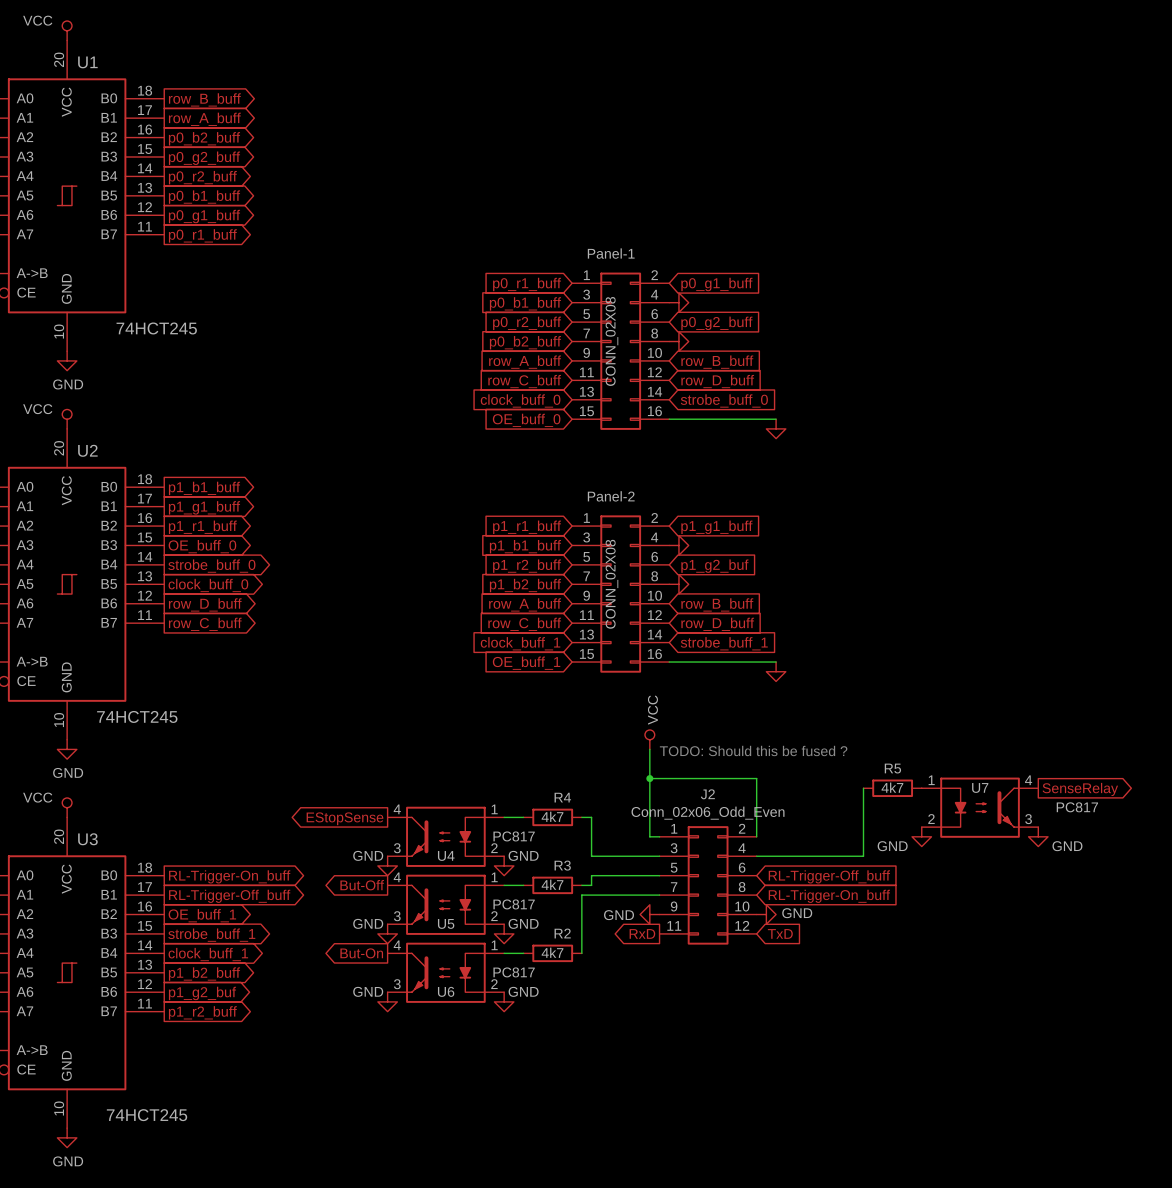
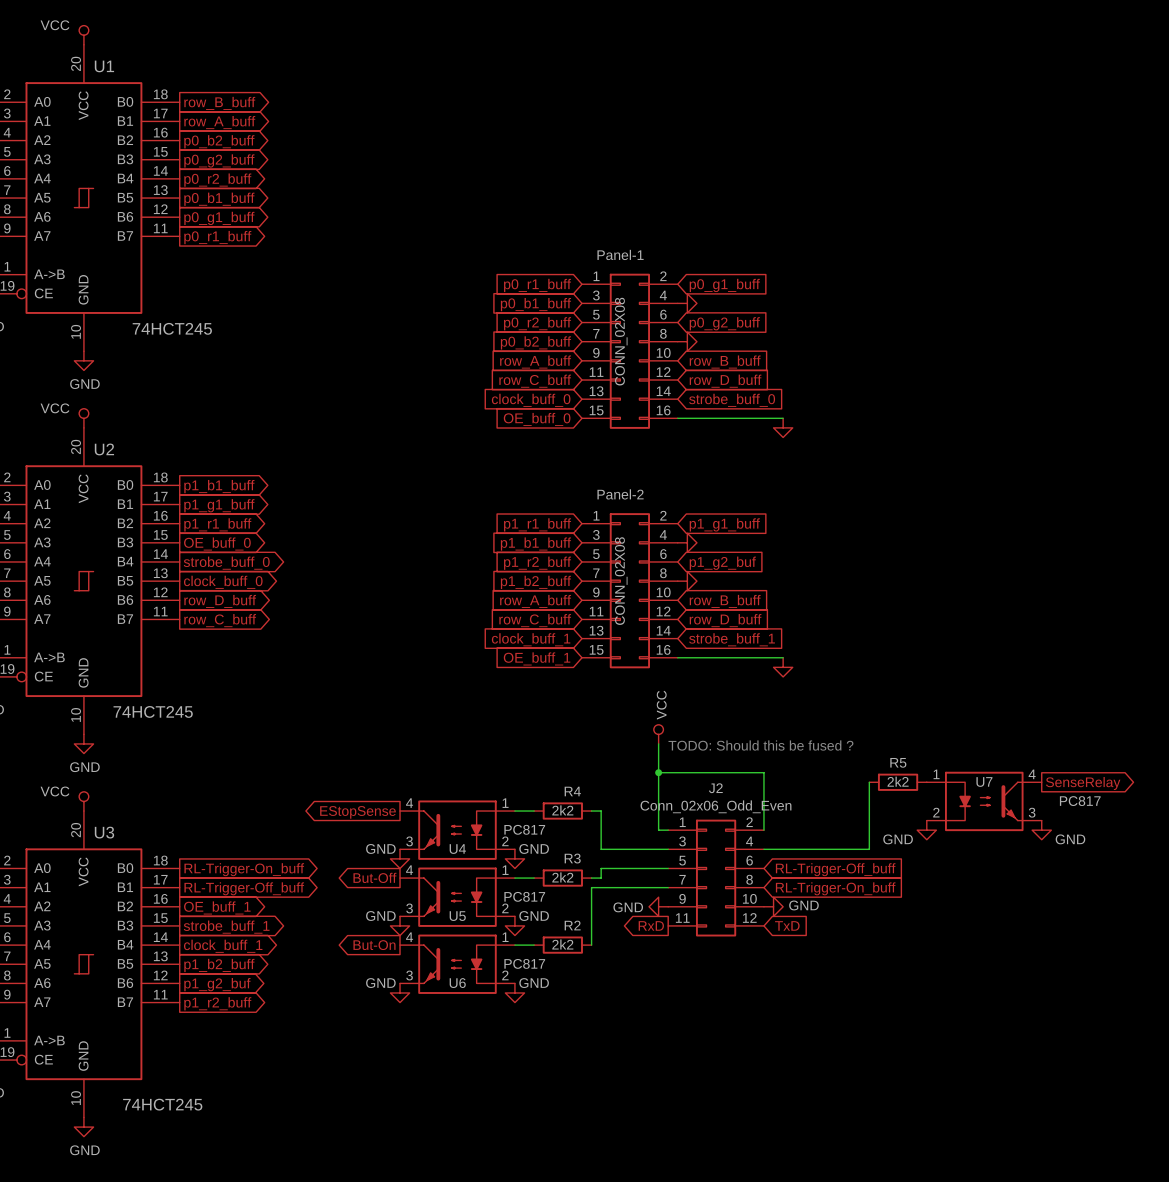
R5 value: 4k7 (892, 787) -> 2k2 (898, 781)
R4 value: 4k7 (552, 816) -> 2k2 (562, 810)
R3 value: 4k7 (552, 884) -> 2k2 (562, 877)
R2 value: 4k7 (552, 952) -> 2k2 (562, 944)

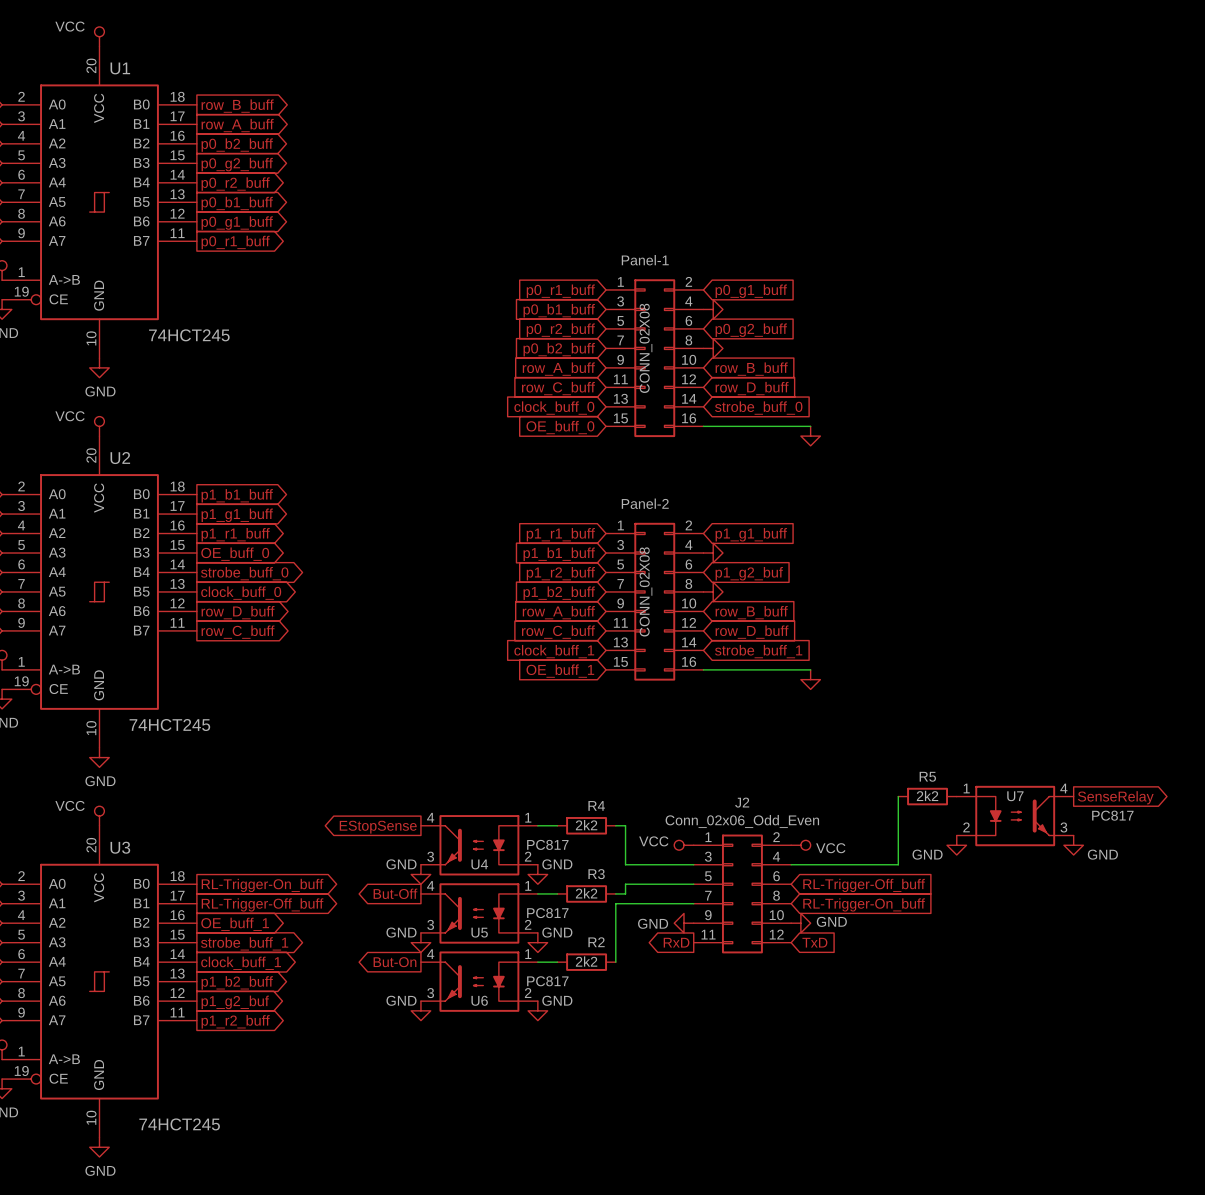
power symbol: VCC (658, 734) -> none
wire: (658, 743) (658, 830) (668, 830) -> none
text: TODO: Should this be fused ? (760, 745) -> none
wire: (658, 772) (763, 772) (763, 830) -> none
junction: (658, 772) -> none
power symbol: none -> VCC (683, 845)
power symbol: none -> VCC (800, 845)

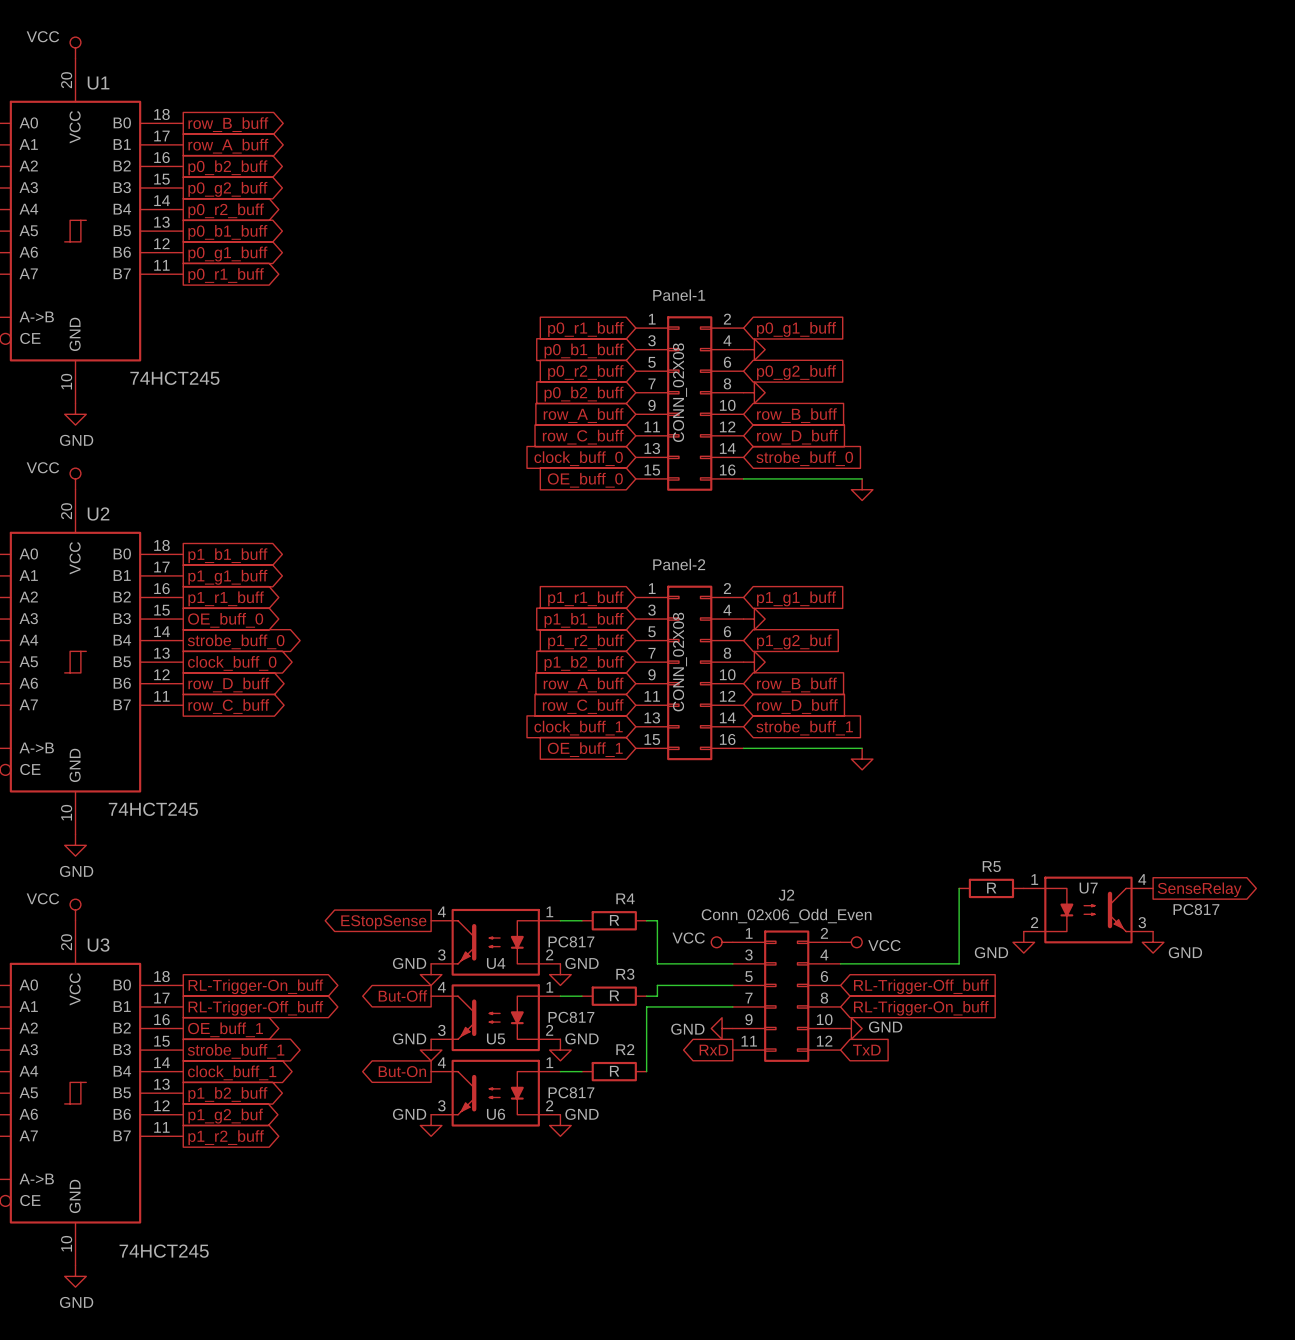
R5 value: 2k2 (927, 795) -> R (991, 888)
R4 value: 2k2 (586, 825) -> R (614, 920)
R3 value: 2k2 (586, 893) -> R (614, 995)
R2 value: 2k2 (586, 961) -> R (614, 1071)

